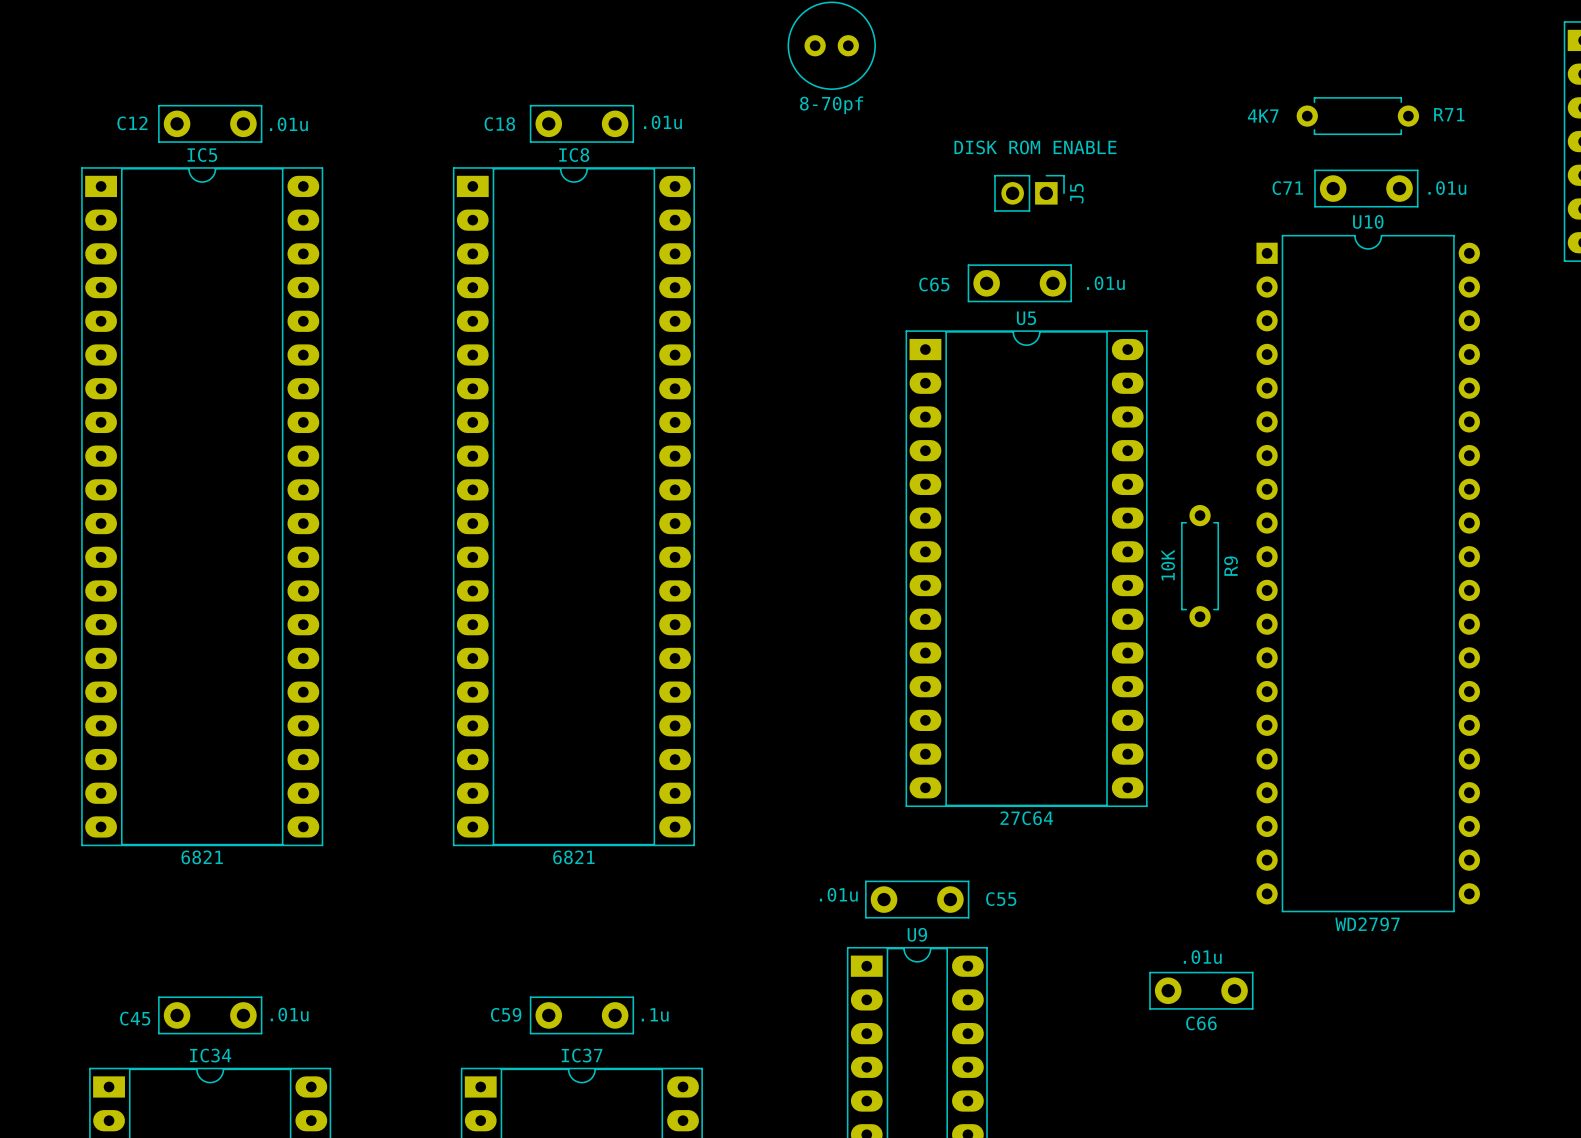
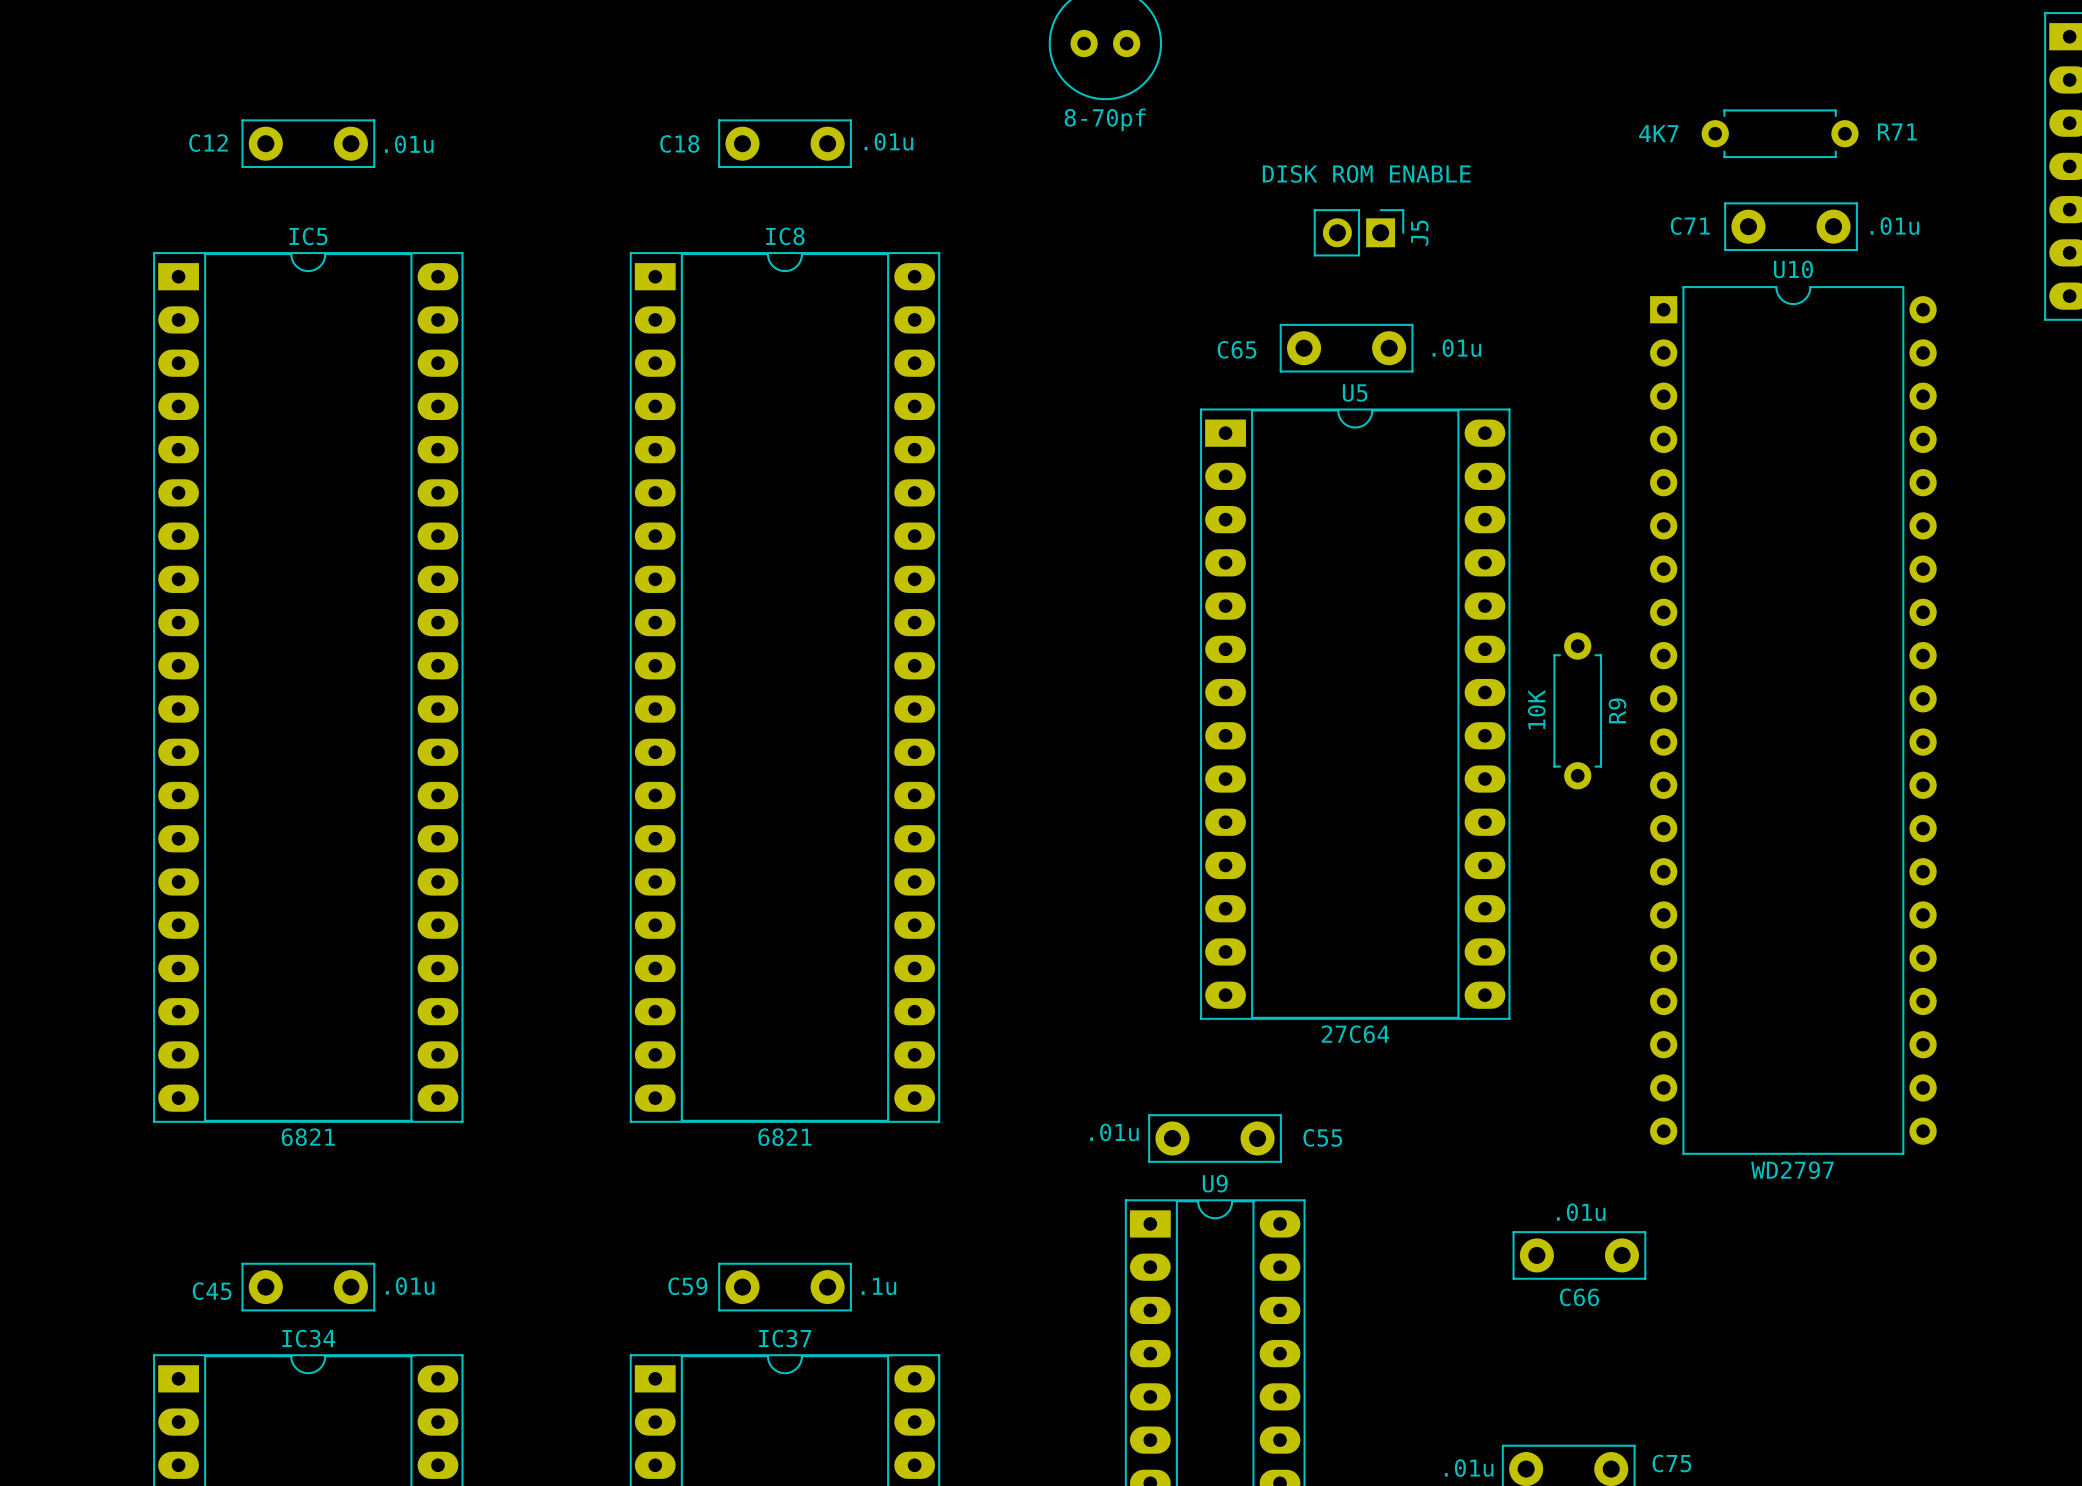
IC5 position: (202, 506) -> (308, 687)
IC8 position: (573, 506) -> (784, 687)

